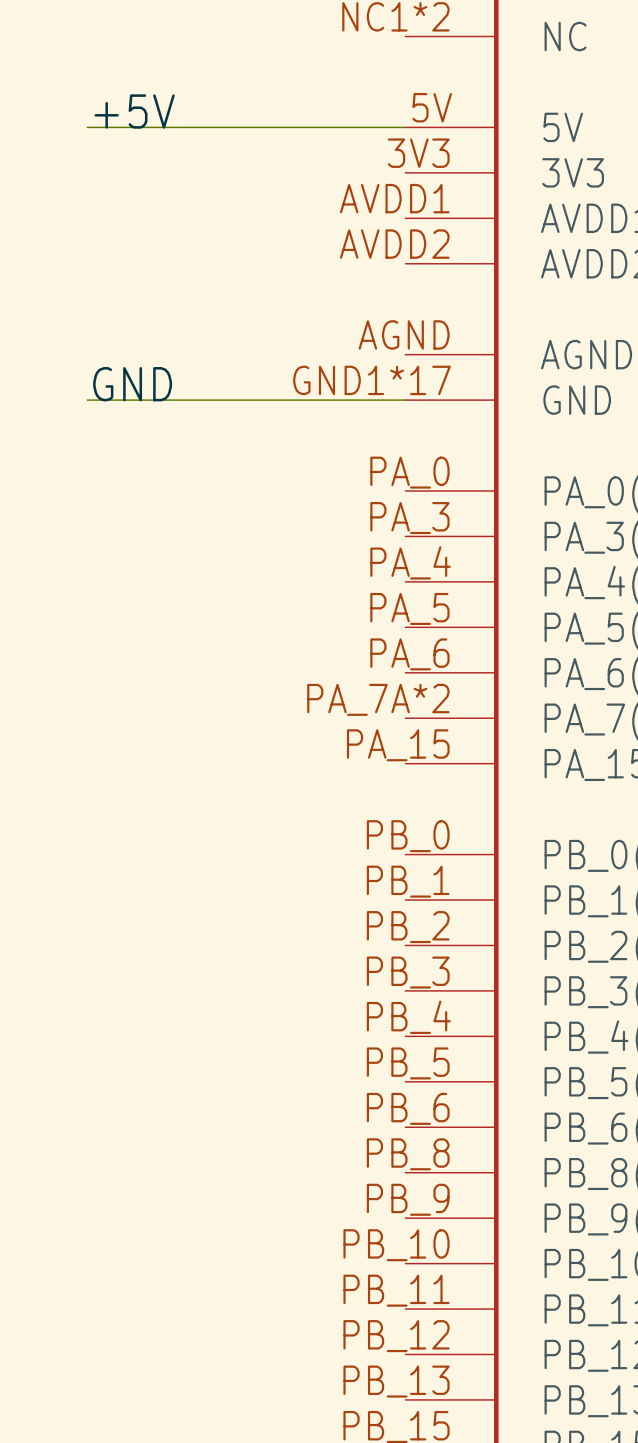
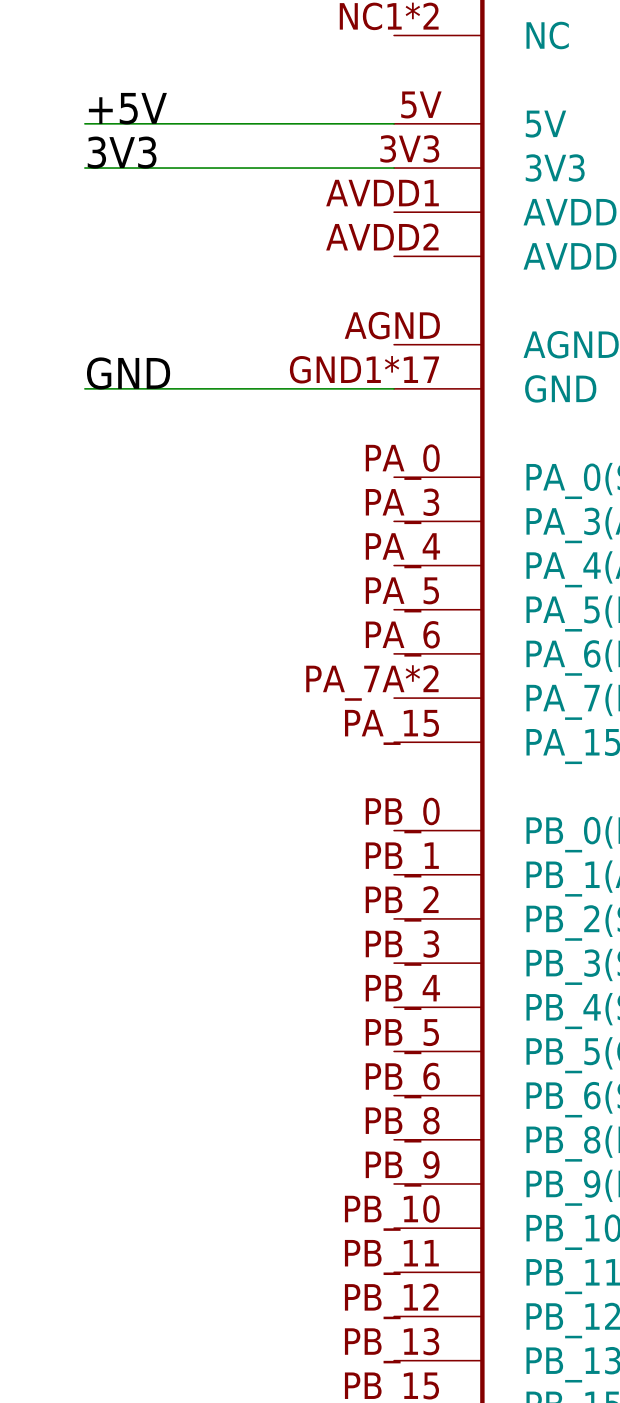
label: none -> 3V3 (122, 152)
wire: none -> (84, 168) (394, 168)

